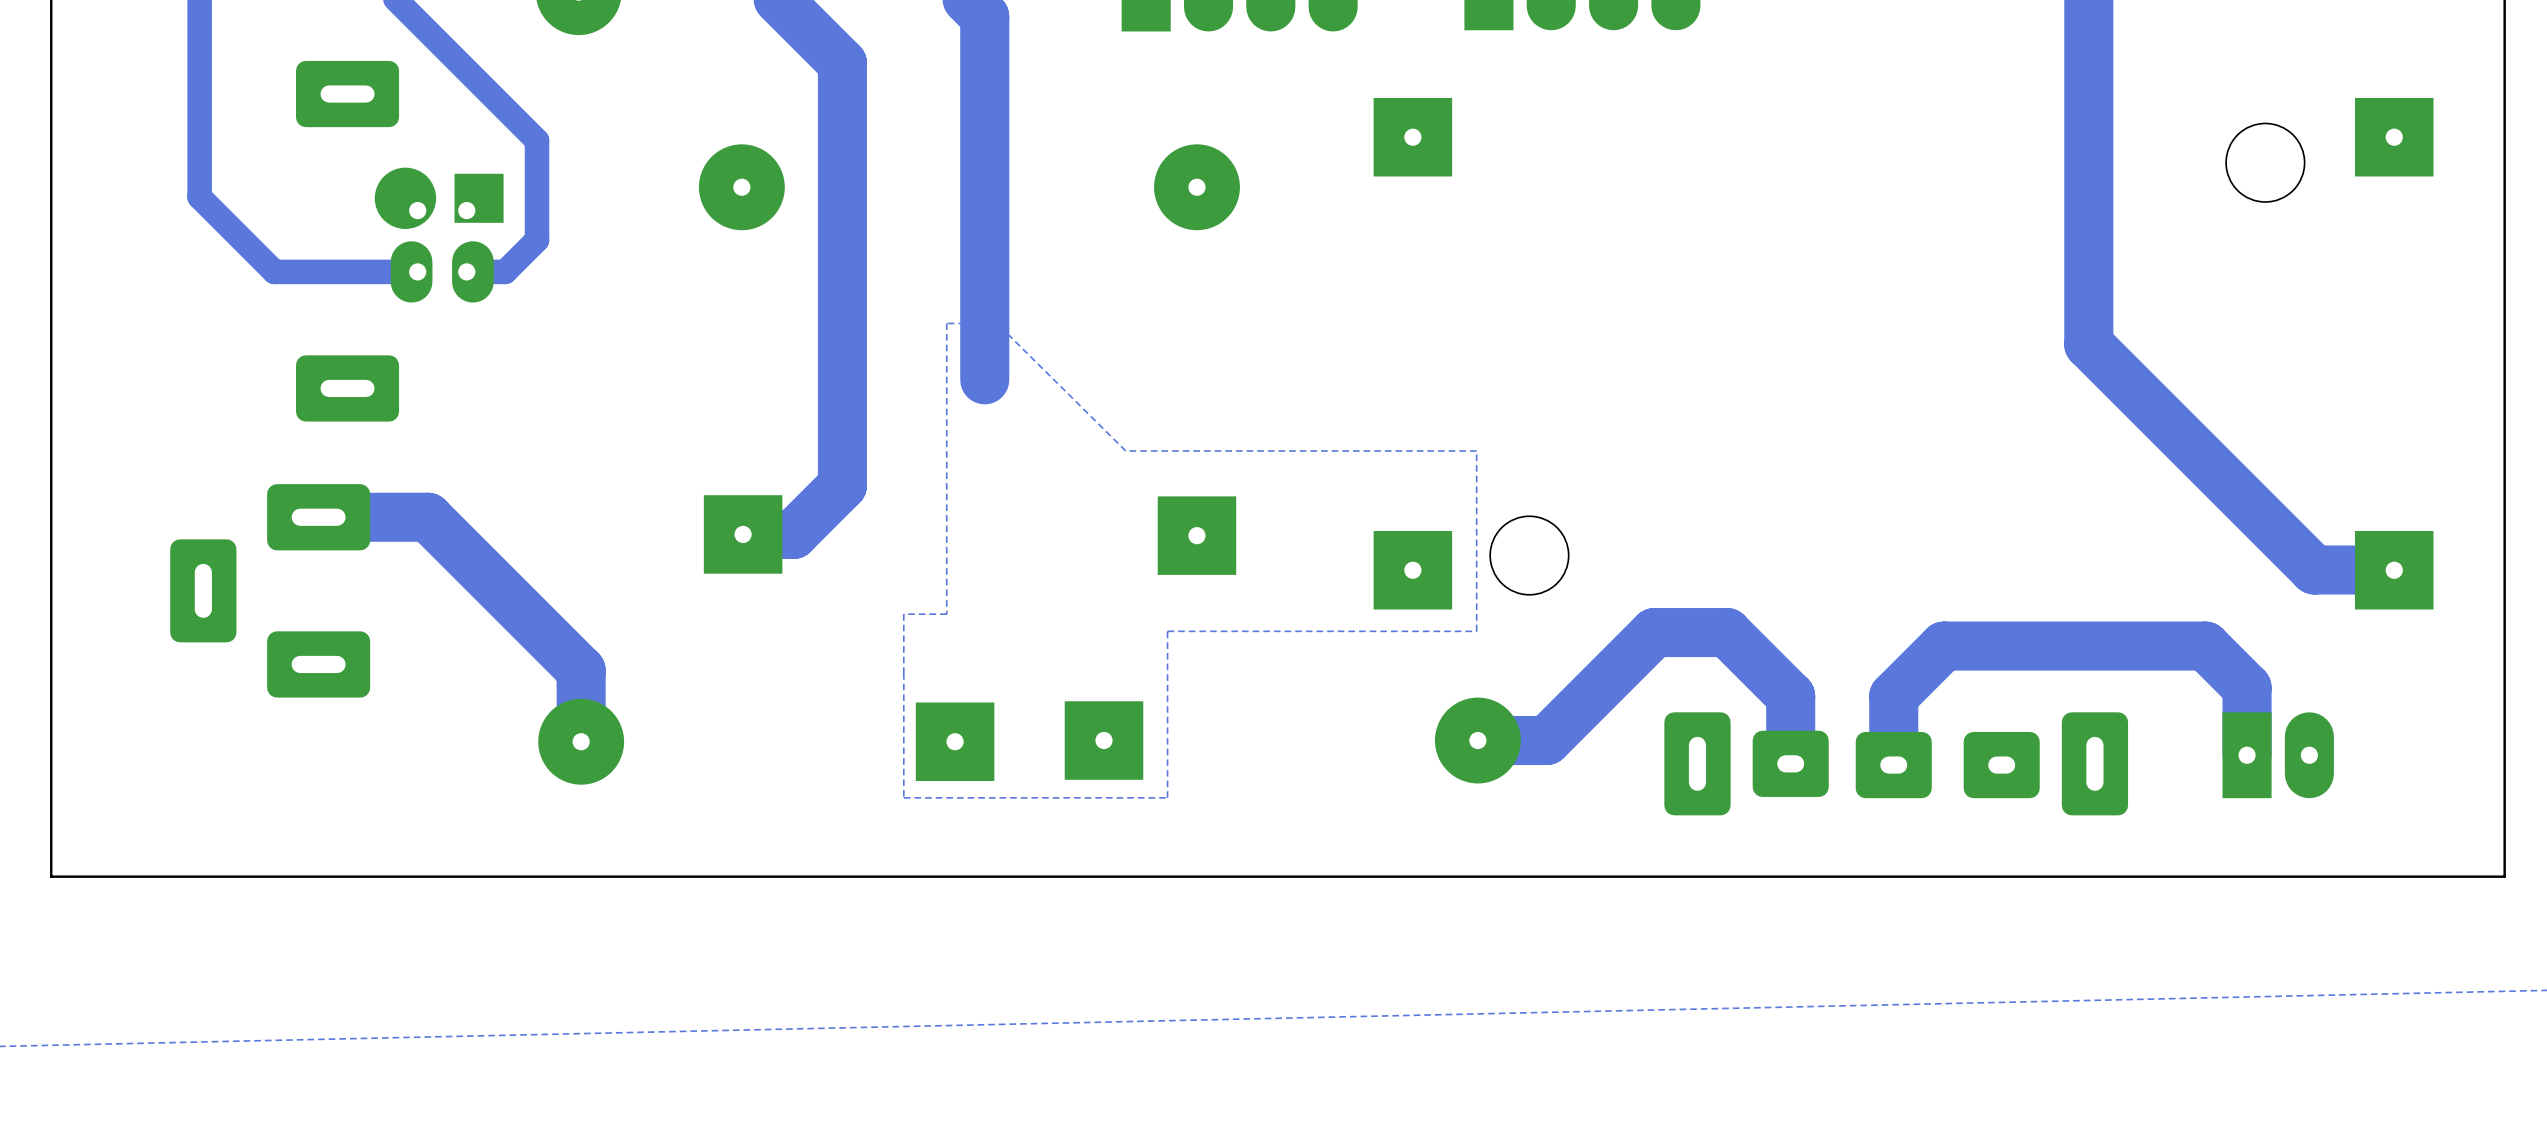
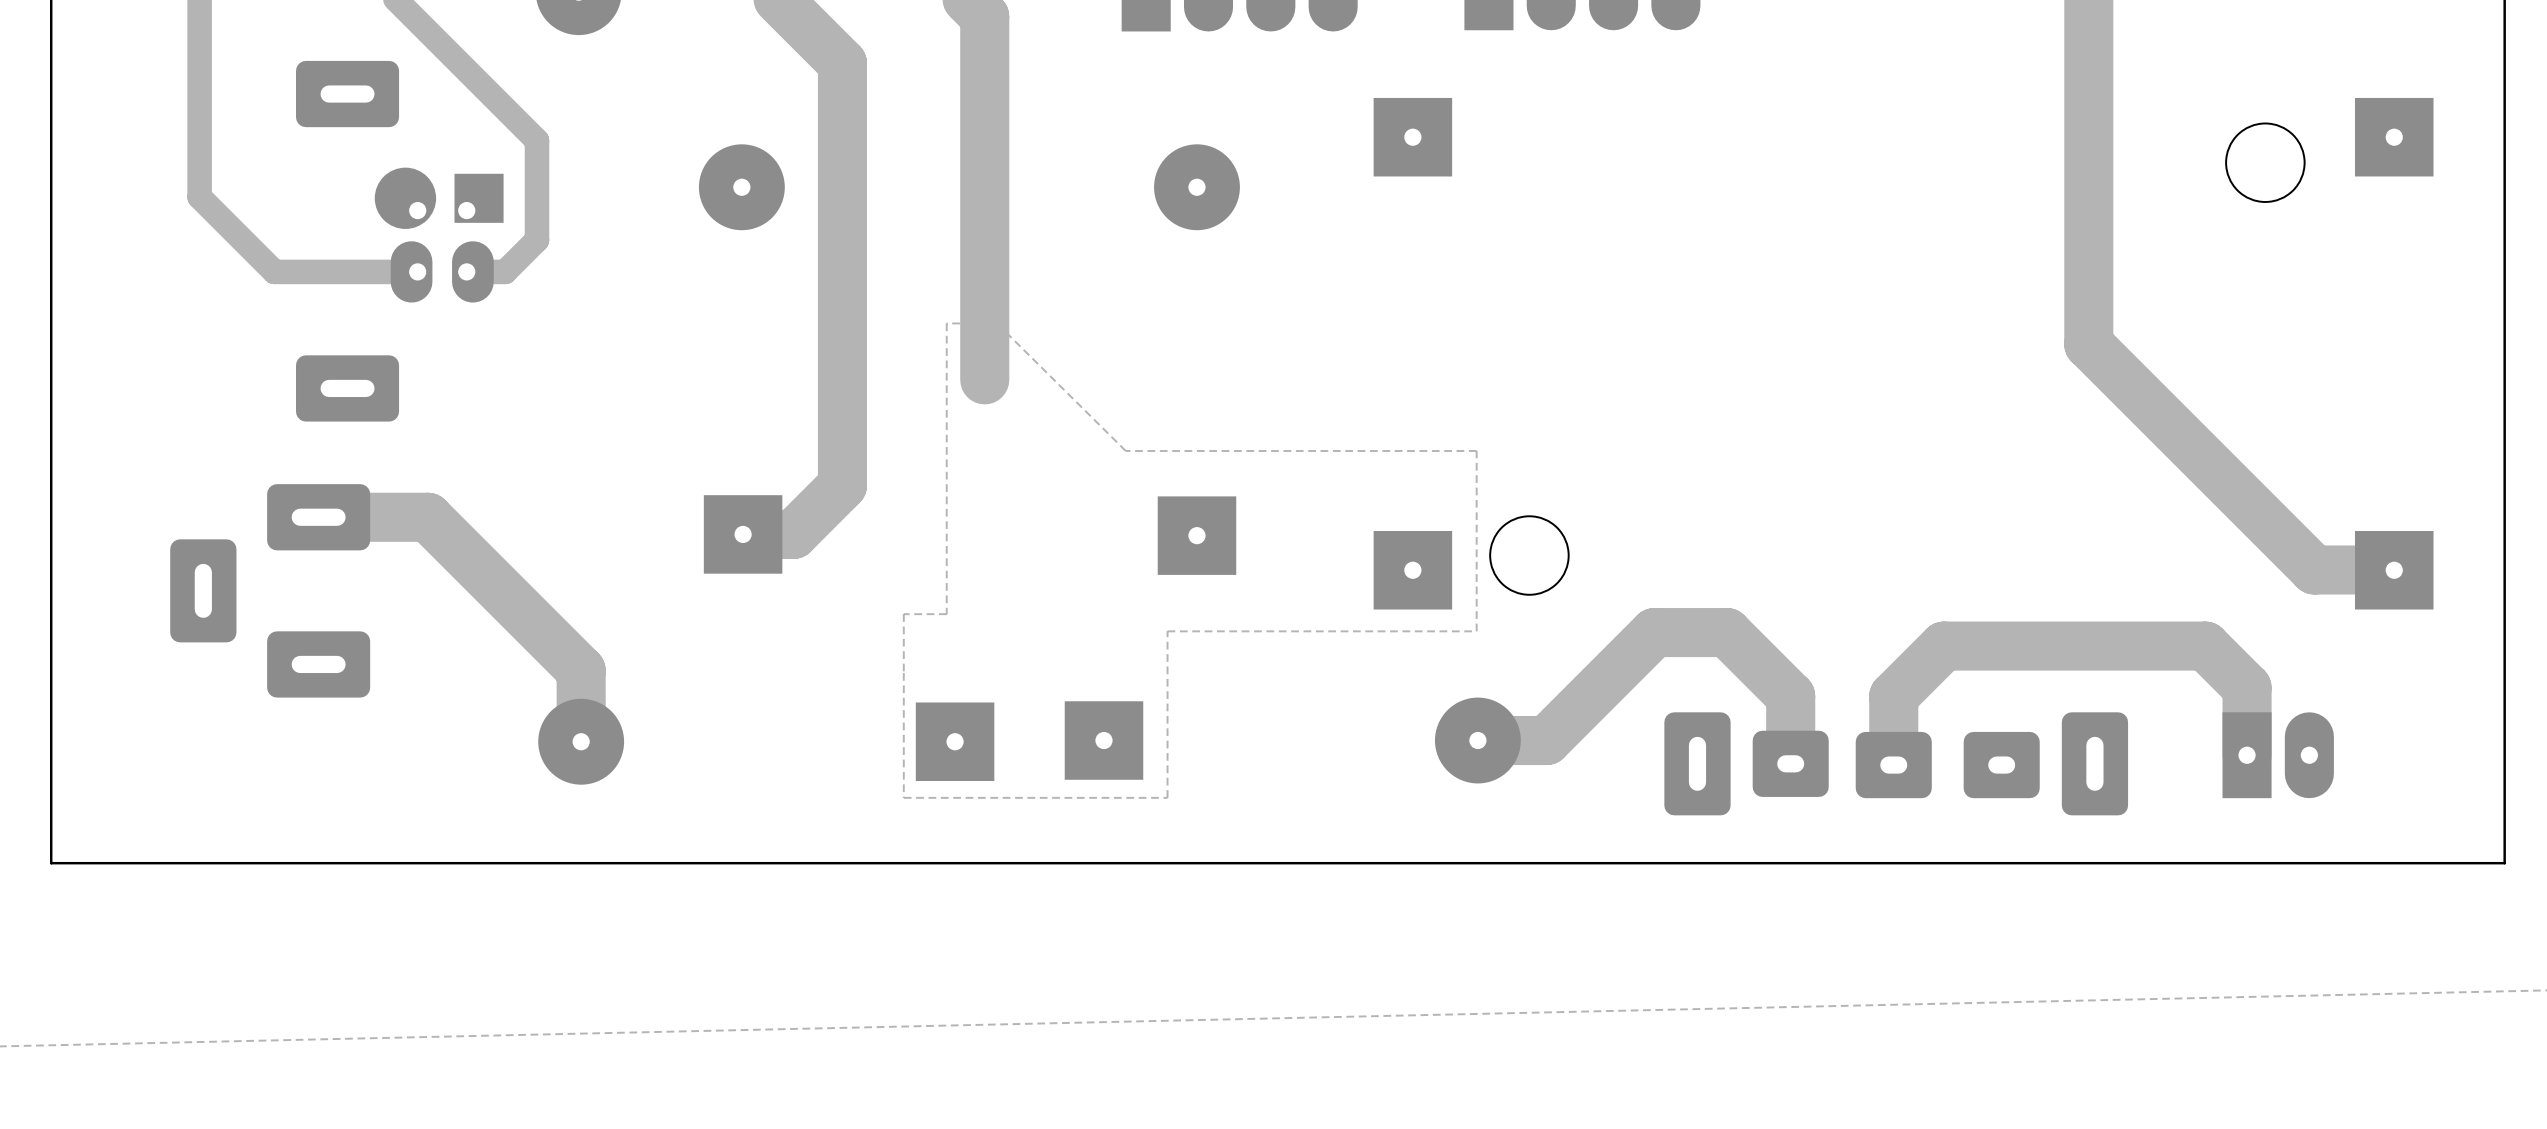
board edge: (2504, 863) (2504, 876) (51, 876) (51, 863) -> (2504, 863) (51, 863)

